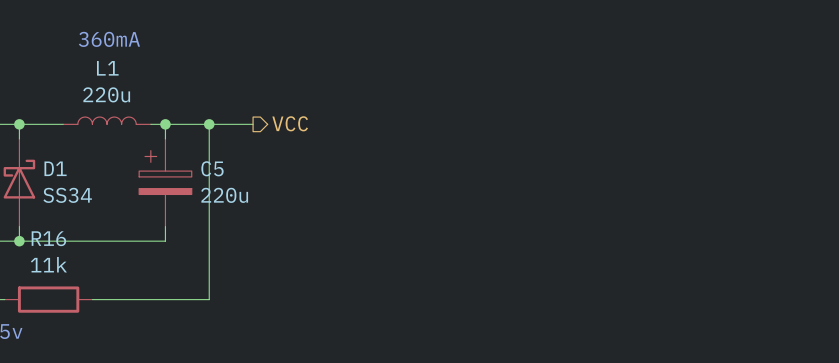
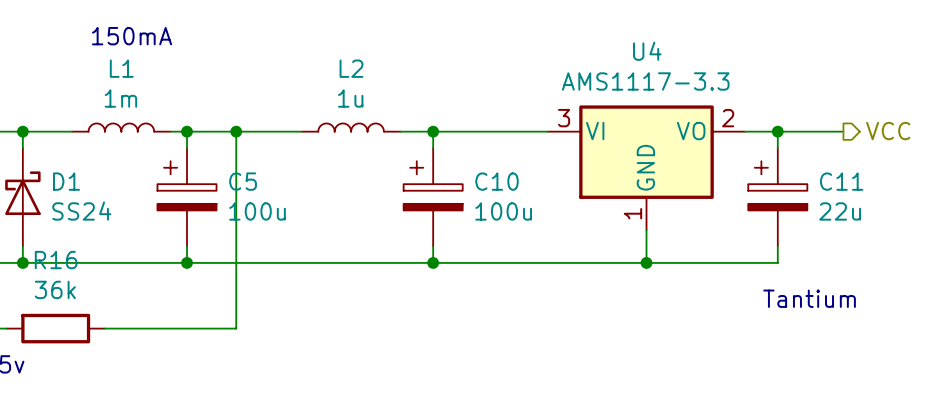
text: 360mA (109, 39) -> 150mA (132, 36)
L1 value: 220u (106, 94) -> 1m (120, 98)
L2: none -> 1u (351, 127)
hierarchical label: VCC (290, 123) -> none
hierarchical label: none -> VCC (888, 131)
wire: none -> (285, 131) (301, 131)
wire: none -> (400, 131) (548, 131)
wire: none -> (433, 131) (433, 148)
junction: none -> (433, 131)
wire: none -> (744, 131) (843, 131)
wire: none -> (777, 131) (777, 148)
junction: none -> (777, 131)
U4: none -> AMS1117-3.3 (646, 167)
C10: none -> 100u (433, 197)
C11: none -> 22u (777, 197)
D1 value: SS34 (67, 195) -> SS24 (81, 211)
C5 value: 220u (224, 195) -> 100u (257, 211)
wire: none -> (646, 230) (646, 262)
wire: none -> (433, 246) (433, 262)
wire: none -> (777, 246) (777, 262) (186, 262)
junction: none -> (186, 262)
junction: none -> (433, 262)
junction: none -> (646, 262)
R16 value: 11k (48, 264) -> 36k (55, 289)
text: none -> Tantium (809, 298)

